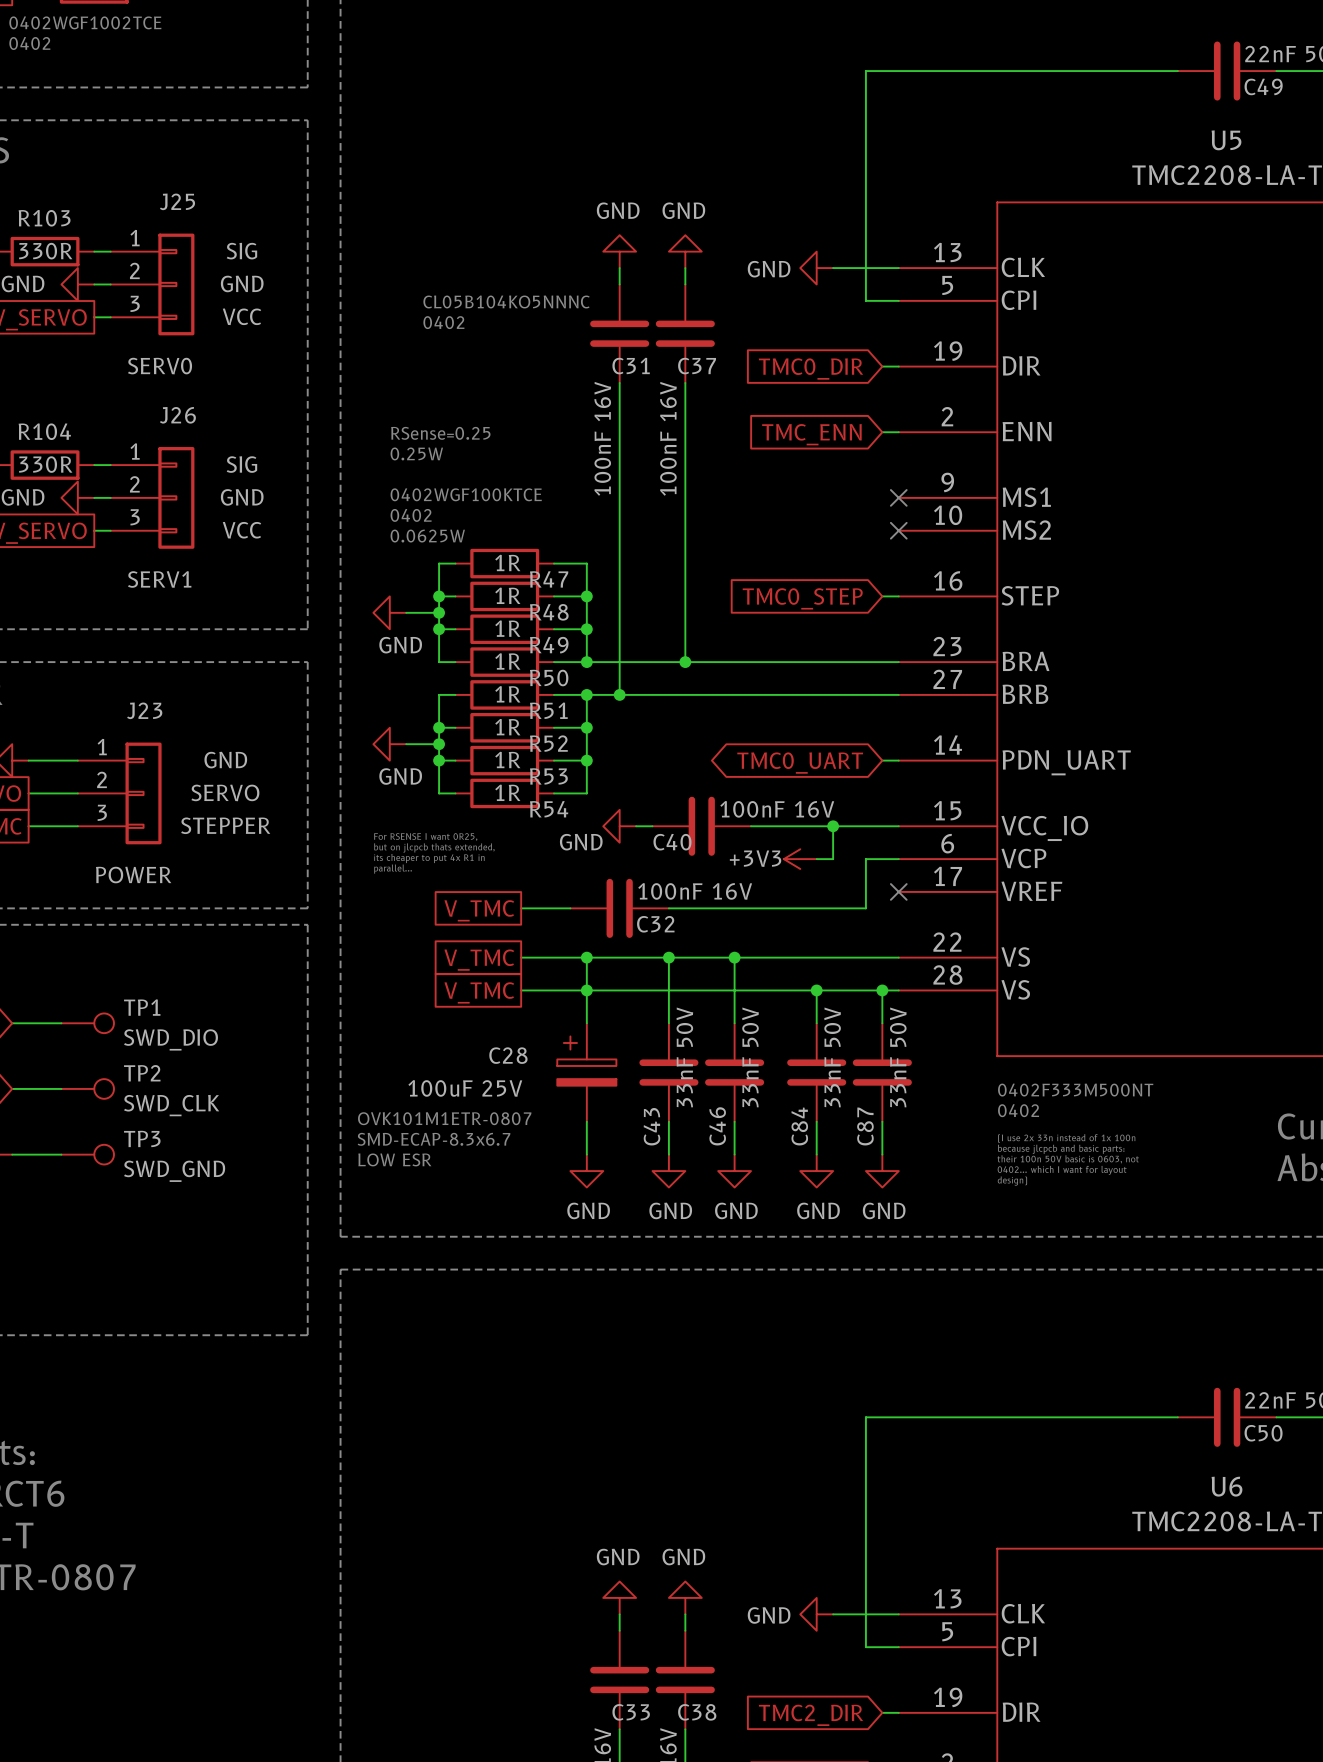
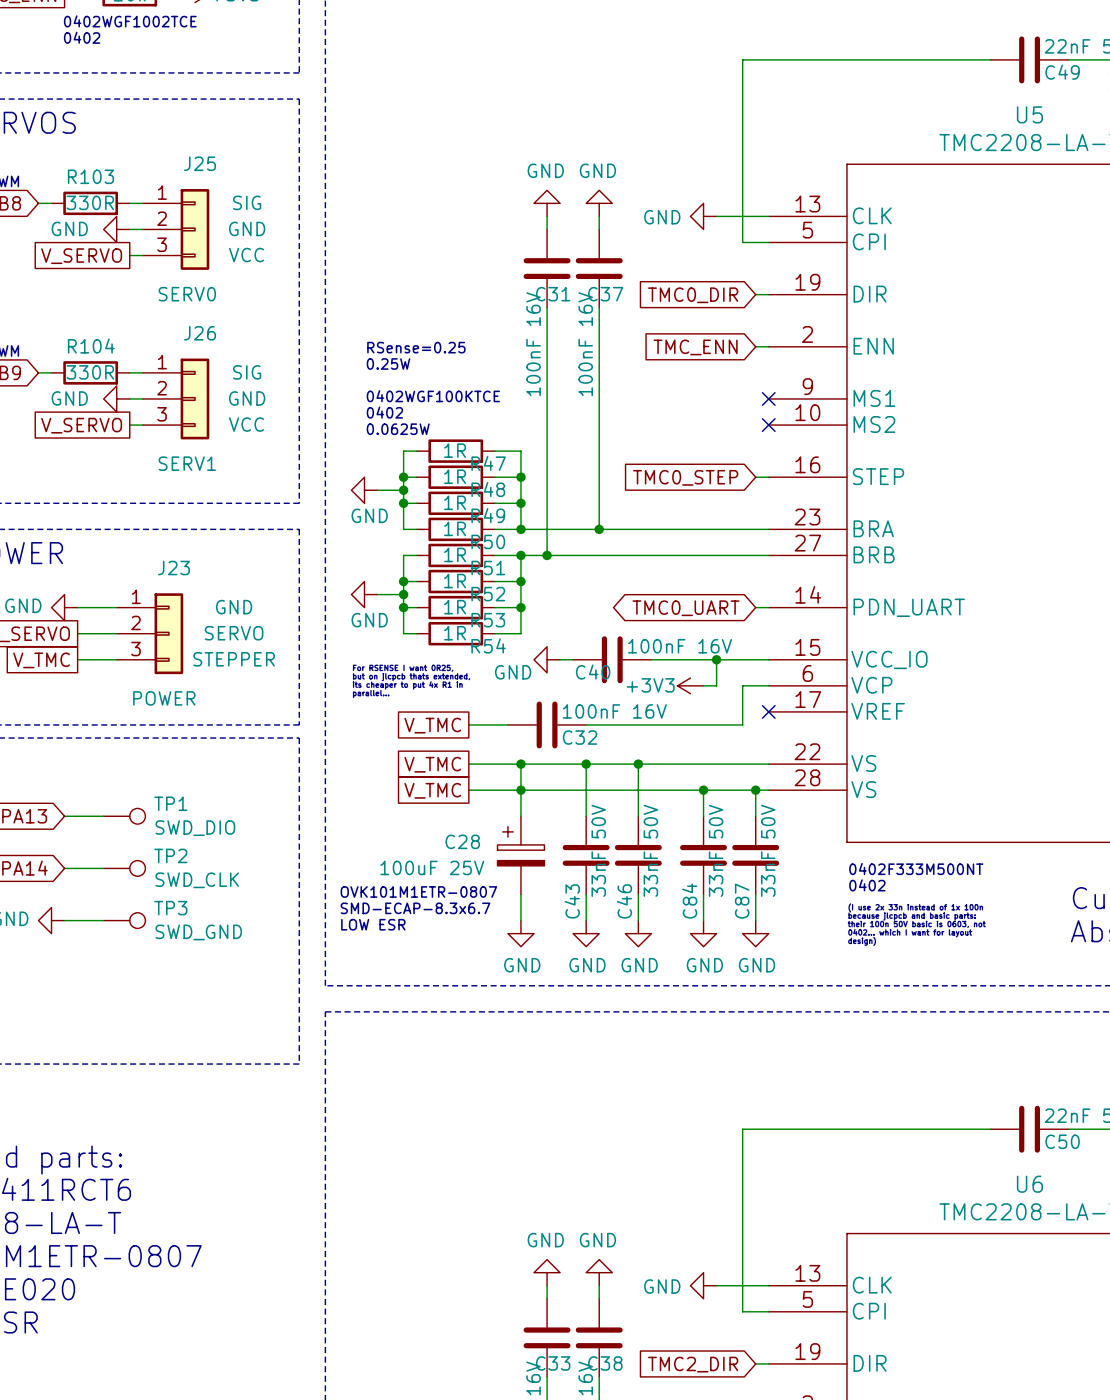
text: CL05B104KO5NNNC (506, 301) -> none
text: 0402 (443, 322) -> none

